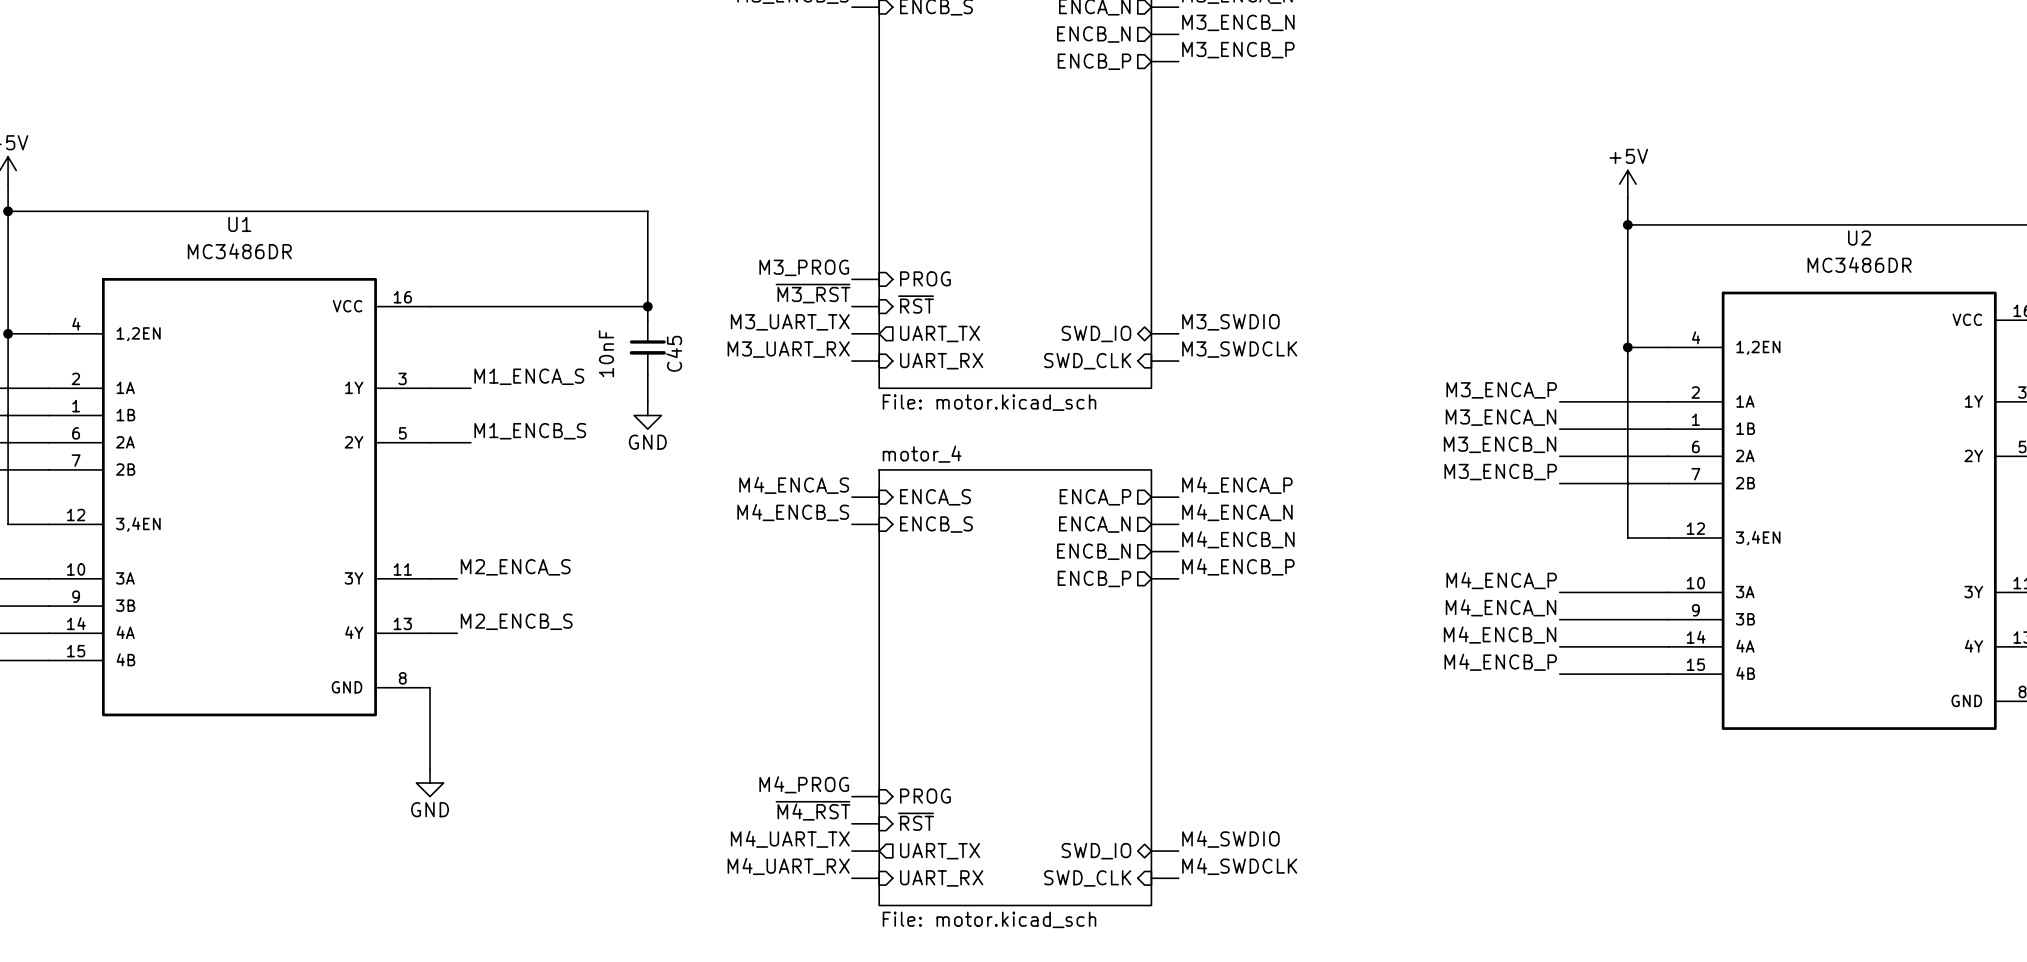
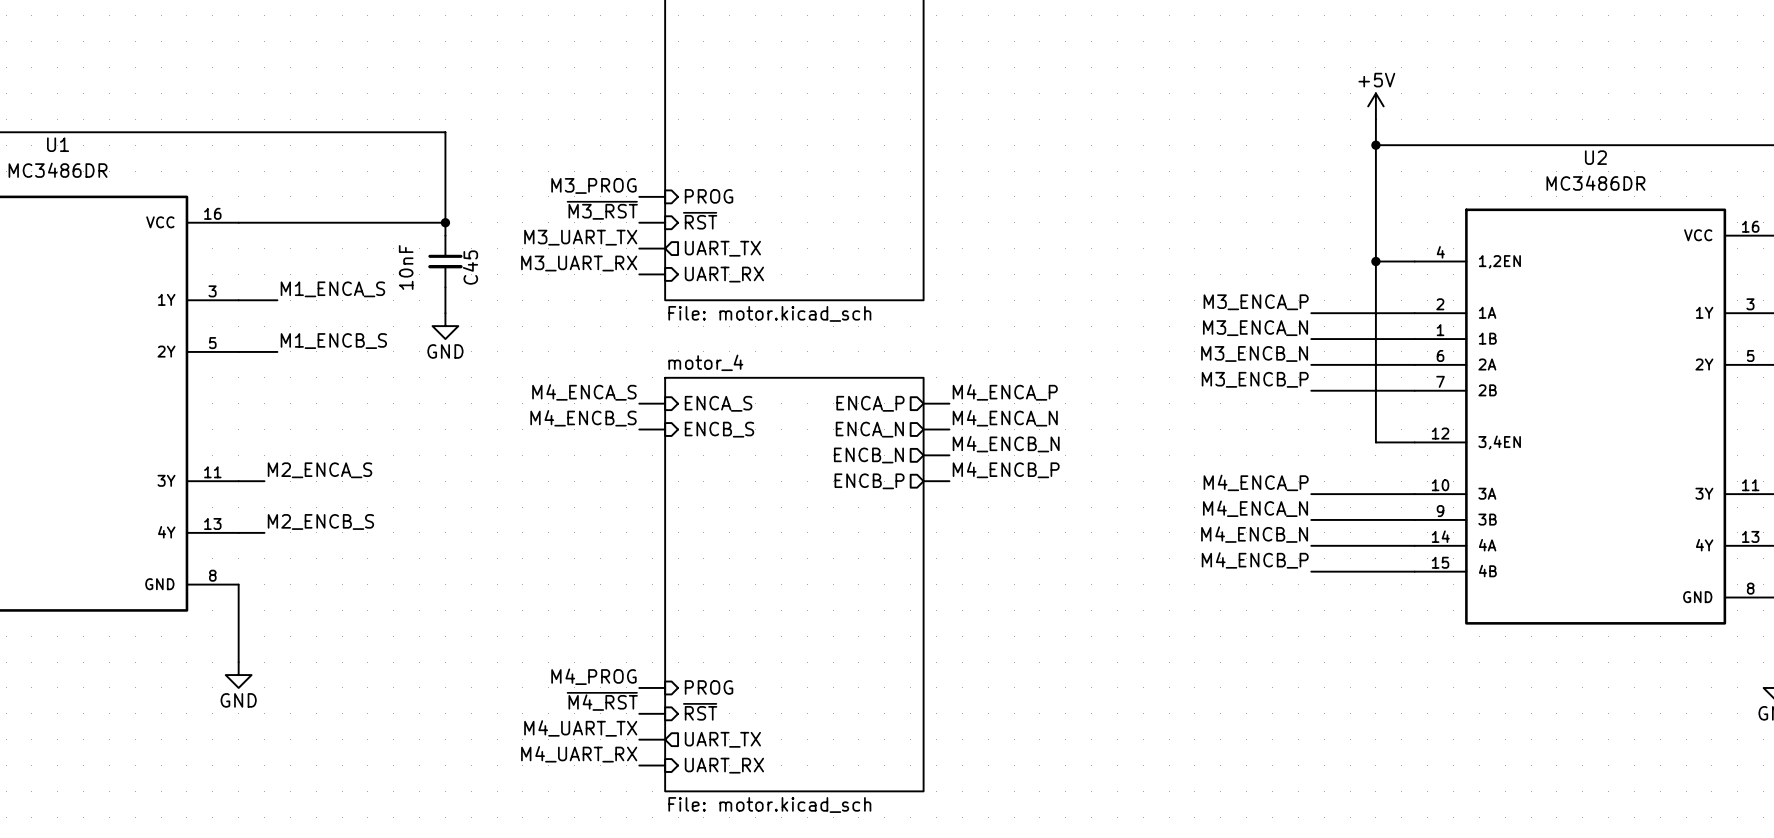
label: M3_SWDIO (1230, 322) -> none
sheet pin: SWD_IO (1096, 333) -> none
wire: (1151, 333) (1178, 333) -> none
label: M3_SWDCLK (1239, 349) -> none
sheet pin: SWD_CLK (1087, 361) -> none
wire: (1151, 361) (1178, 361) -> none
label: M4_SWDIO (1230, 839) -> none
sheet pin: SWD_IO (1096, 851) -> none
wire: (1151, 851) (1178, 851) -> none
label: M4_SWDCLK (1239, 866) -> none
sheet pin: SWD_CLK (1087, 878) -> none
wire: (1151, 878) (1178, 878) -> none

